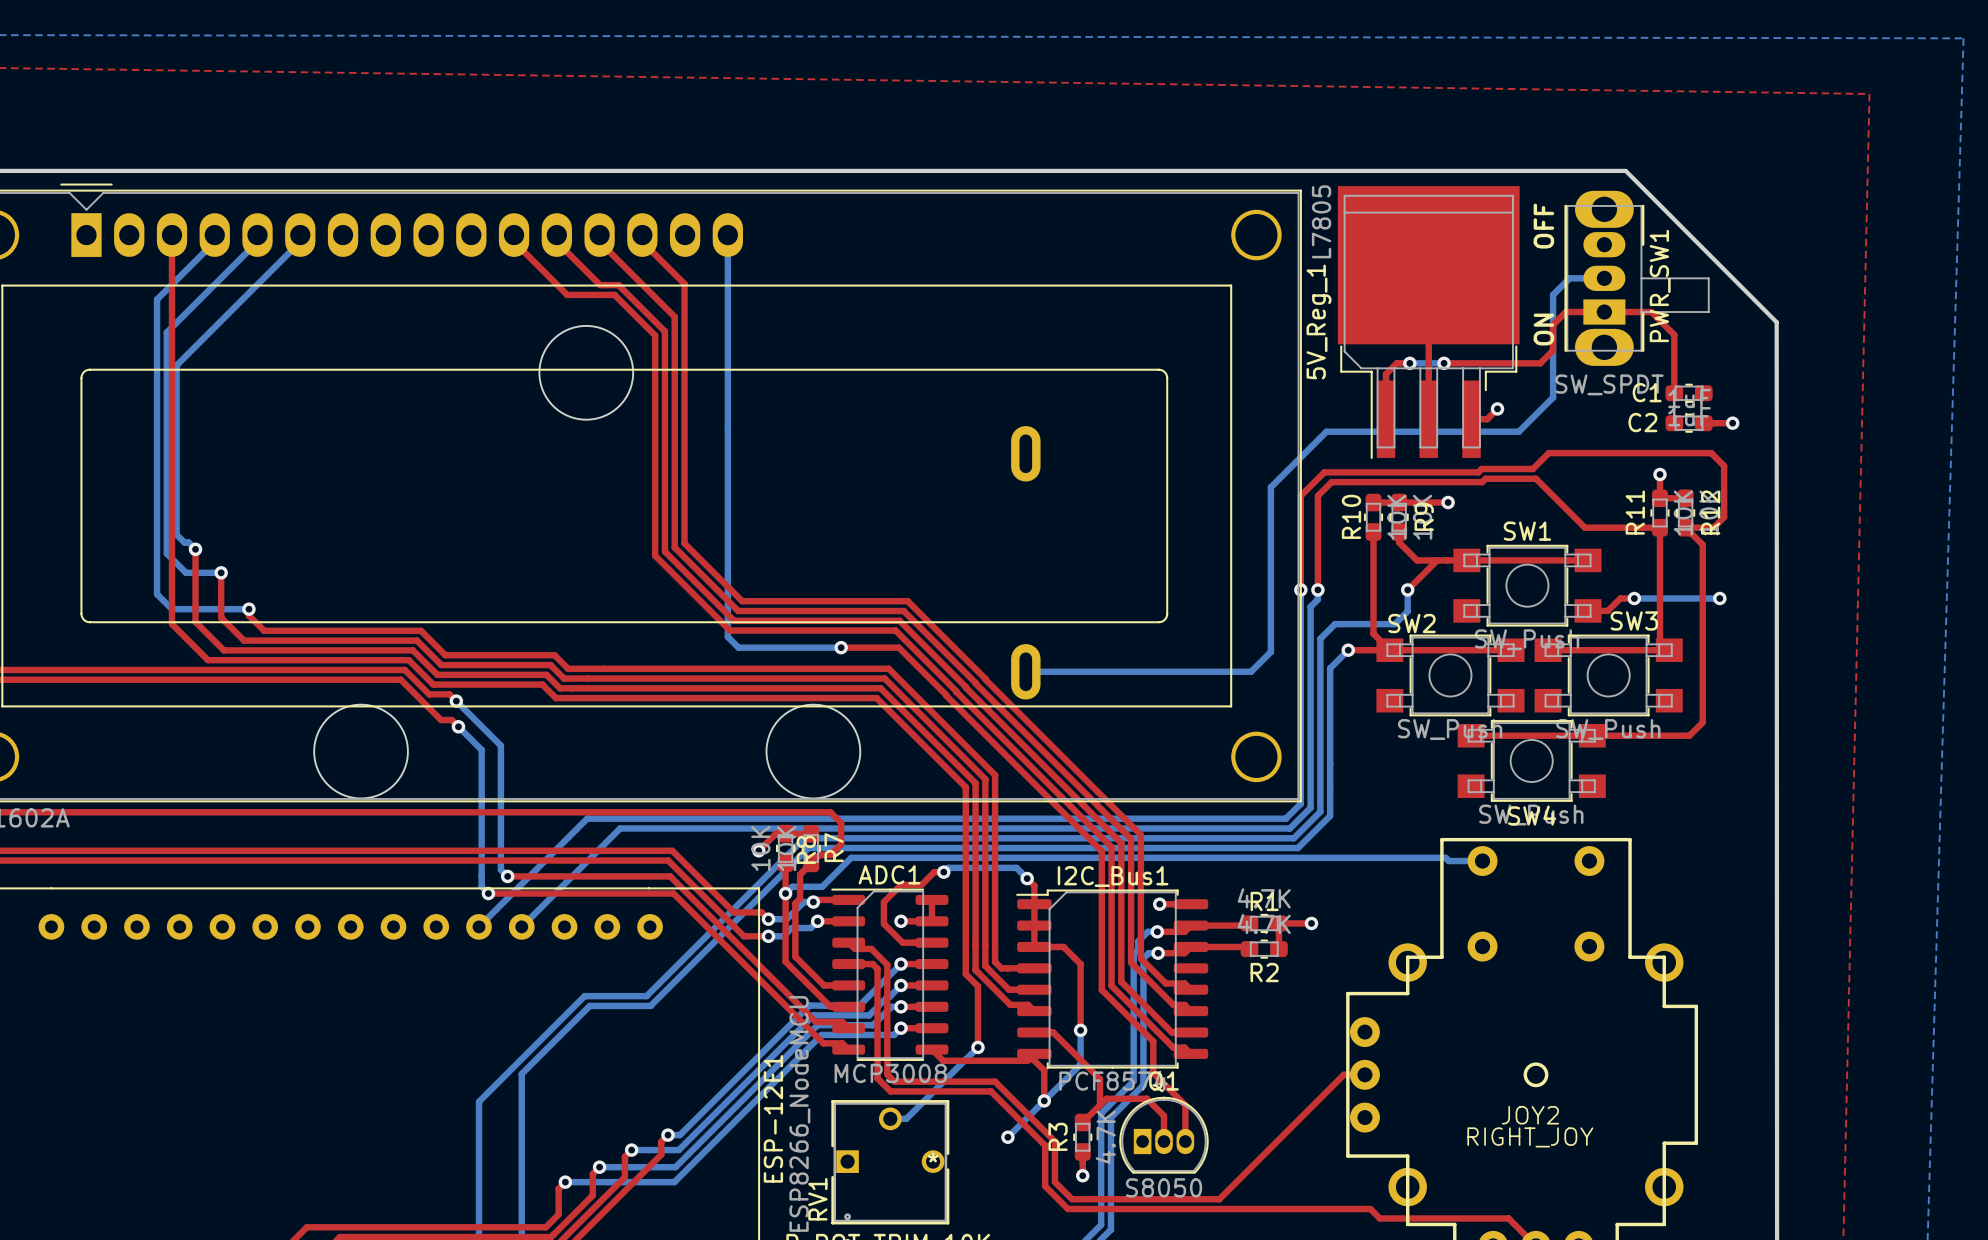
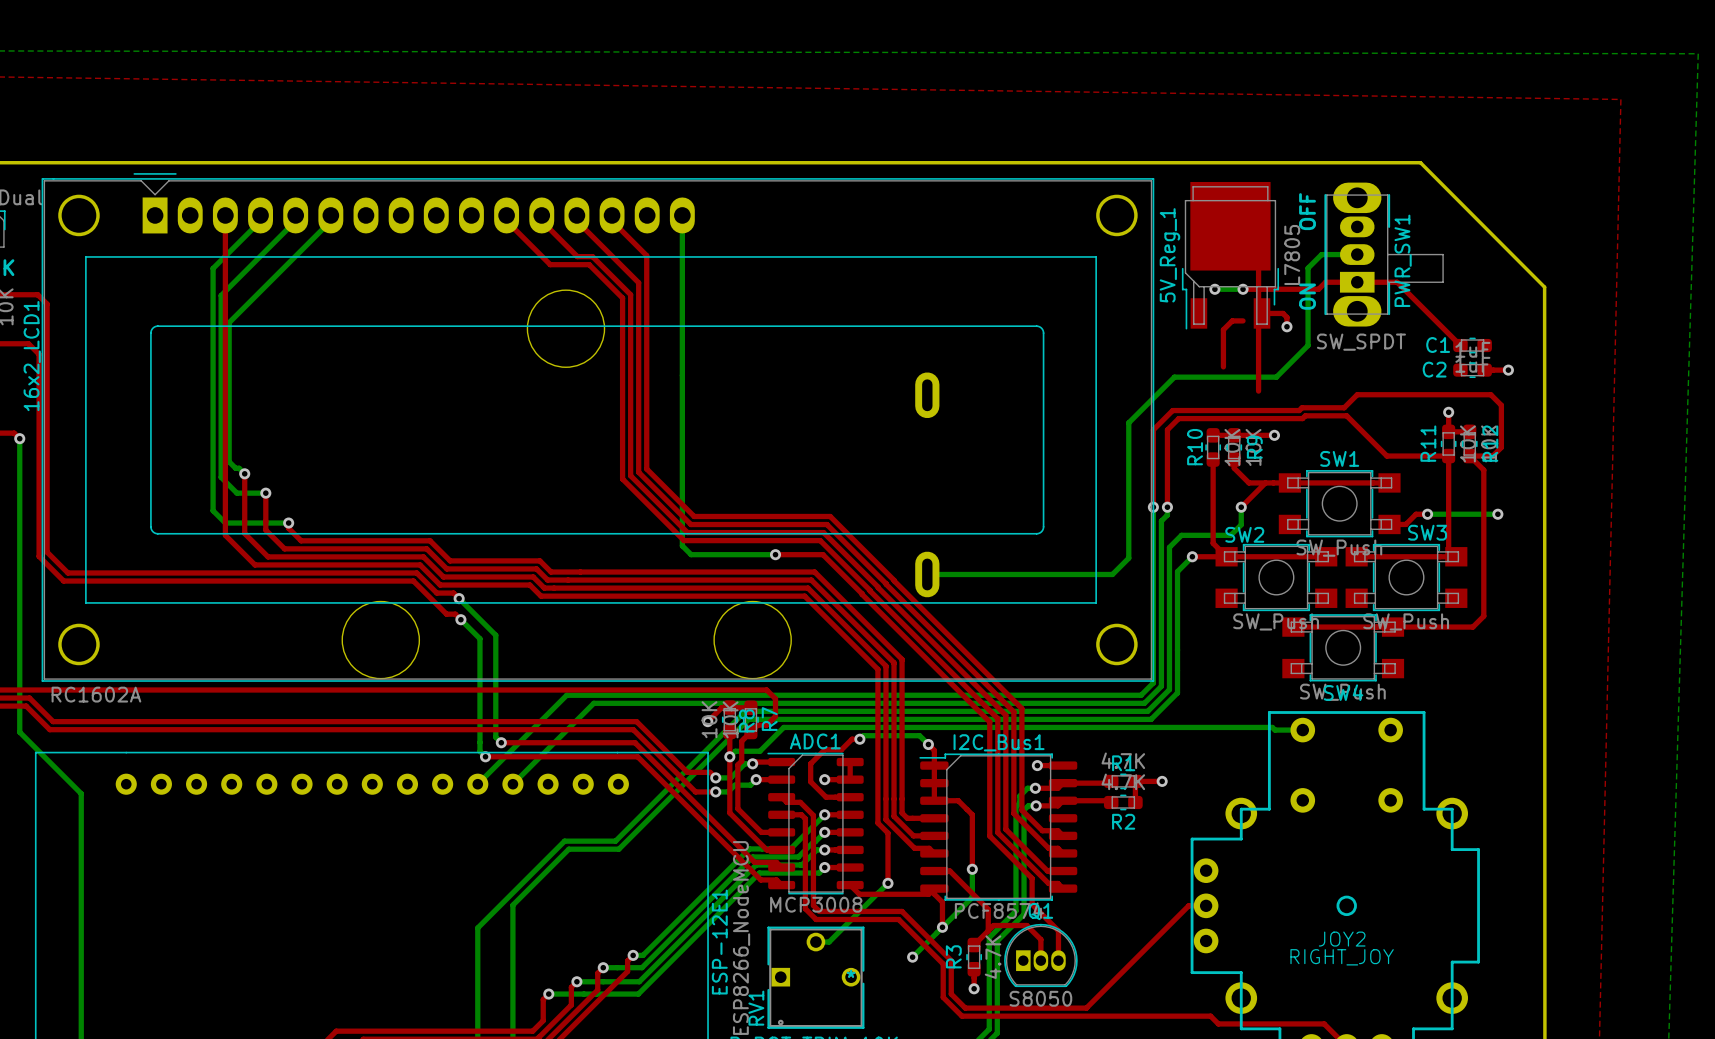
5V_Reg_1 footprint: [1337, 186, 1520, 459] -> [1181, 181, 1280, 330]
5V_Reg_1 value position: L7805 (1321, 221) -> L7805 (1292, 254)
text position: OFF (1543, 226) -> OFF (1307, 211)
bottom track: (1604, 278) (1569, 278) (1553, 294) (1553, 397) (1518, 431) (1450, 431) -> (1357, 254) (1321, 254) (1308, 268) (1308, 345) (1276, 377)
PWR_SW1 position: (1637, 278) -> (1384, 254)
5V_Reg_1 name position: 5V_Reg_1 (1319, 322) -> 5V_Reg_1 (1169, 255)
via: none -> (1214, 289)
via: none -> (1243, 289)
text position: ON (1543, 329) -> ON (1307, 296)
top track: none -> (1262, 313) (1283, 313) (1286, 317) (1286, 326)
bottom track: (1409, 363) (1444, 363) -> (1214, 289) (1243, 289)
via: (1409, 363) -> none
top track: (1444, 363) (1540, 363) (1553, 350) (1553, 324) (1565, 312) (1651, 312) (1674, 334) (1674, 393) -> (1243, 289) (1318, 289) (1325, 282) (1397, 282) (1460, 345)
via position: (1444, 363) -> (1286, 326)
top track: (1497, 408) (1487, 419) (1471, 419) -> none
via: (1497, 408) -> none

